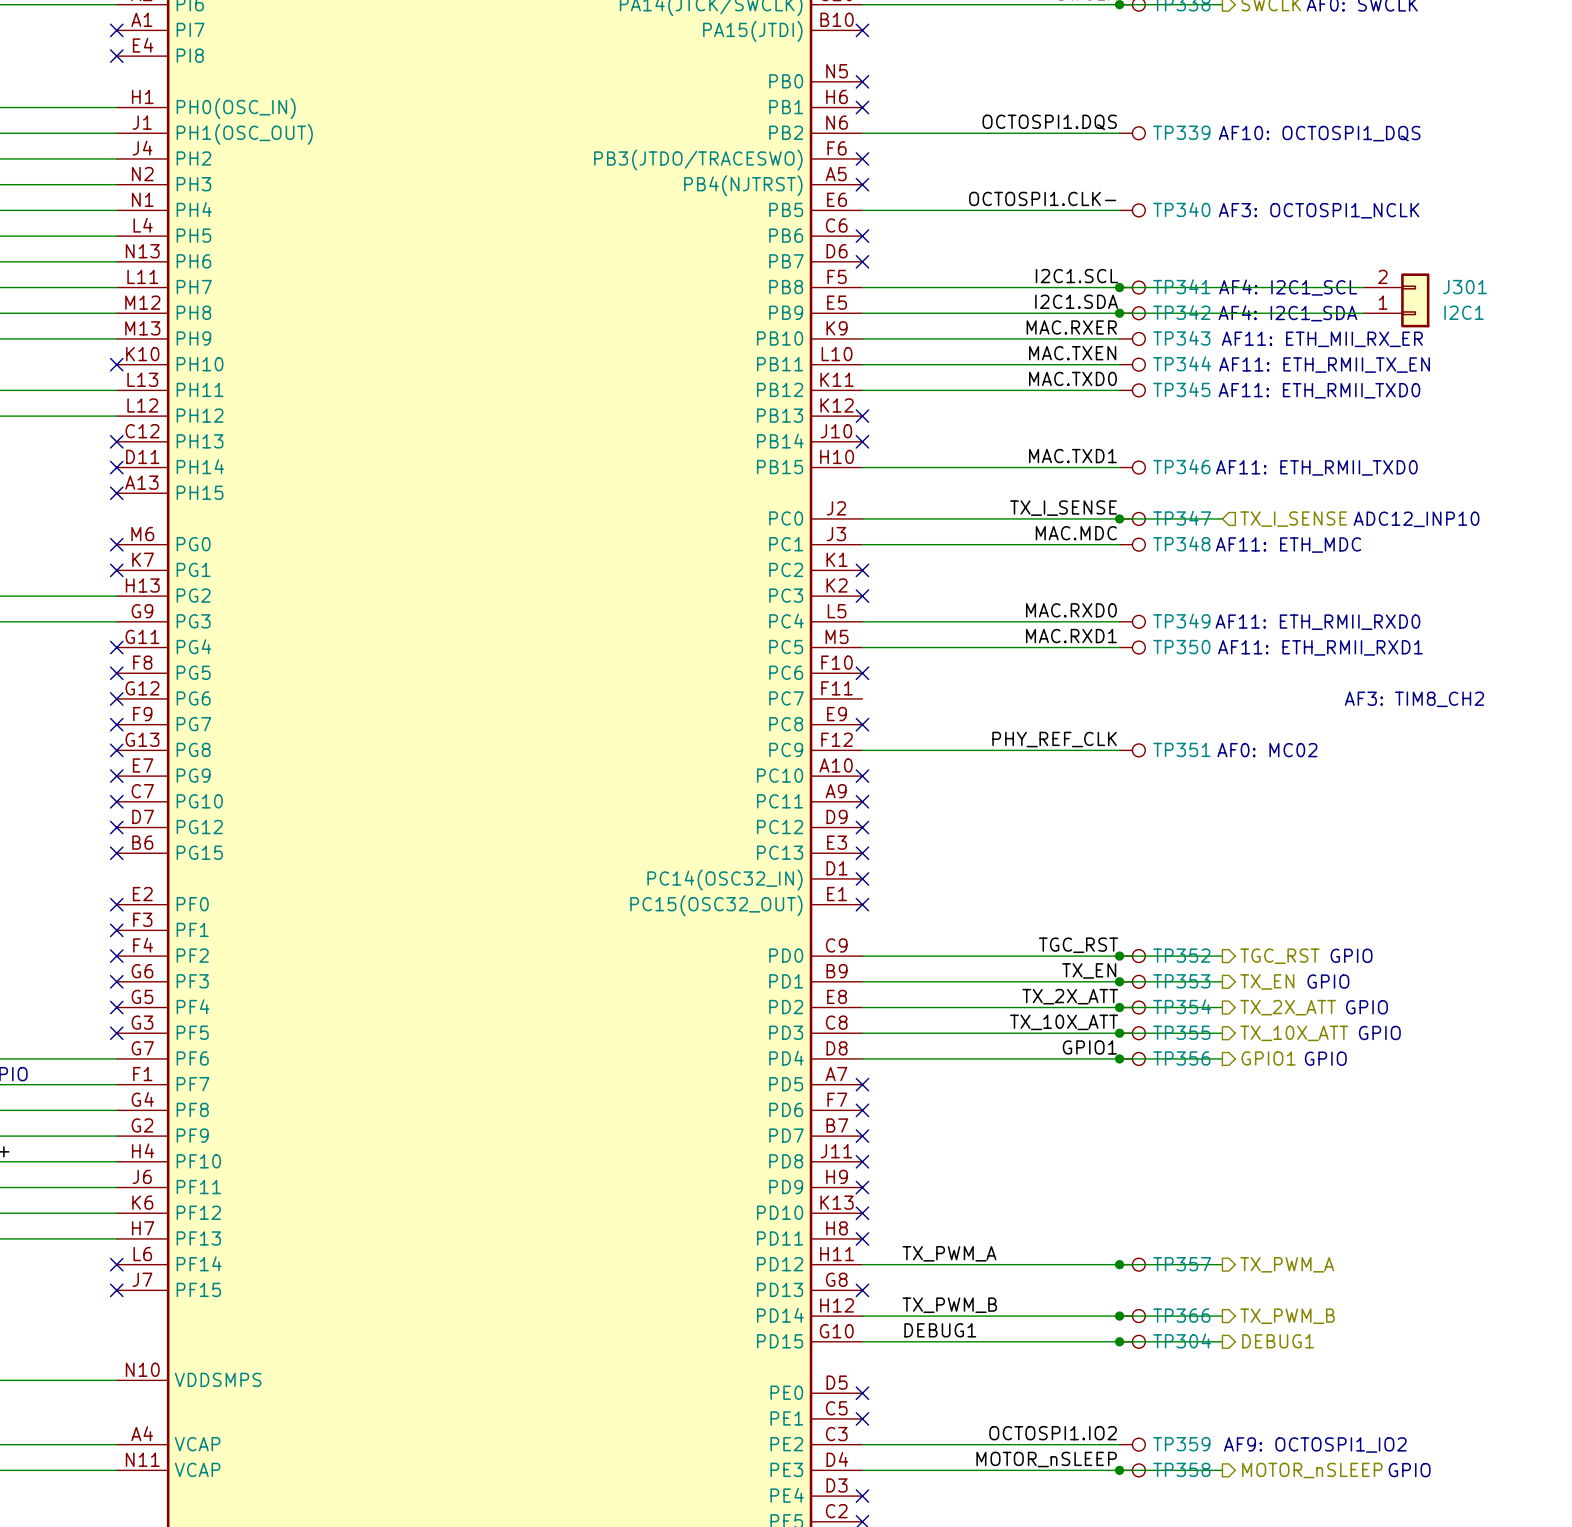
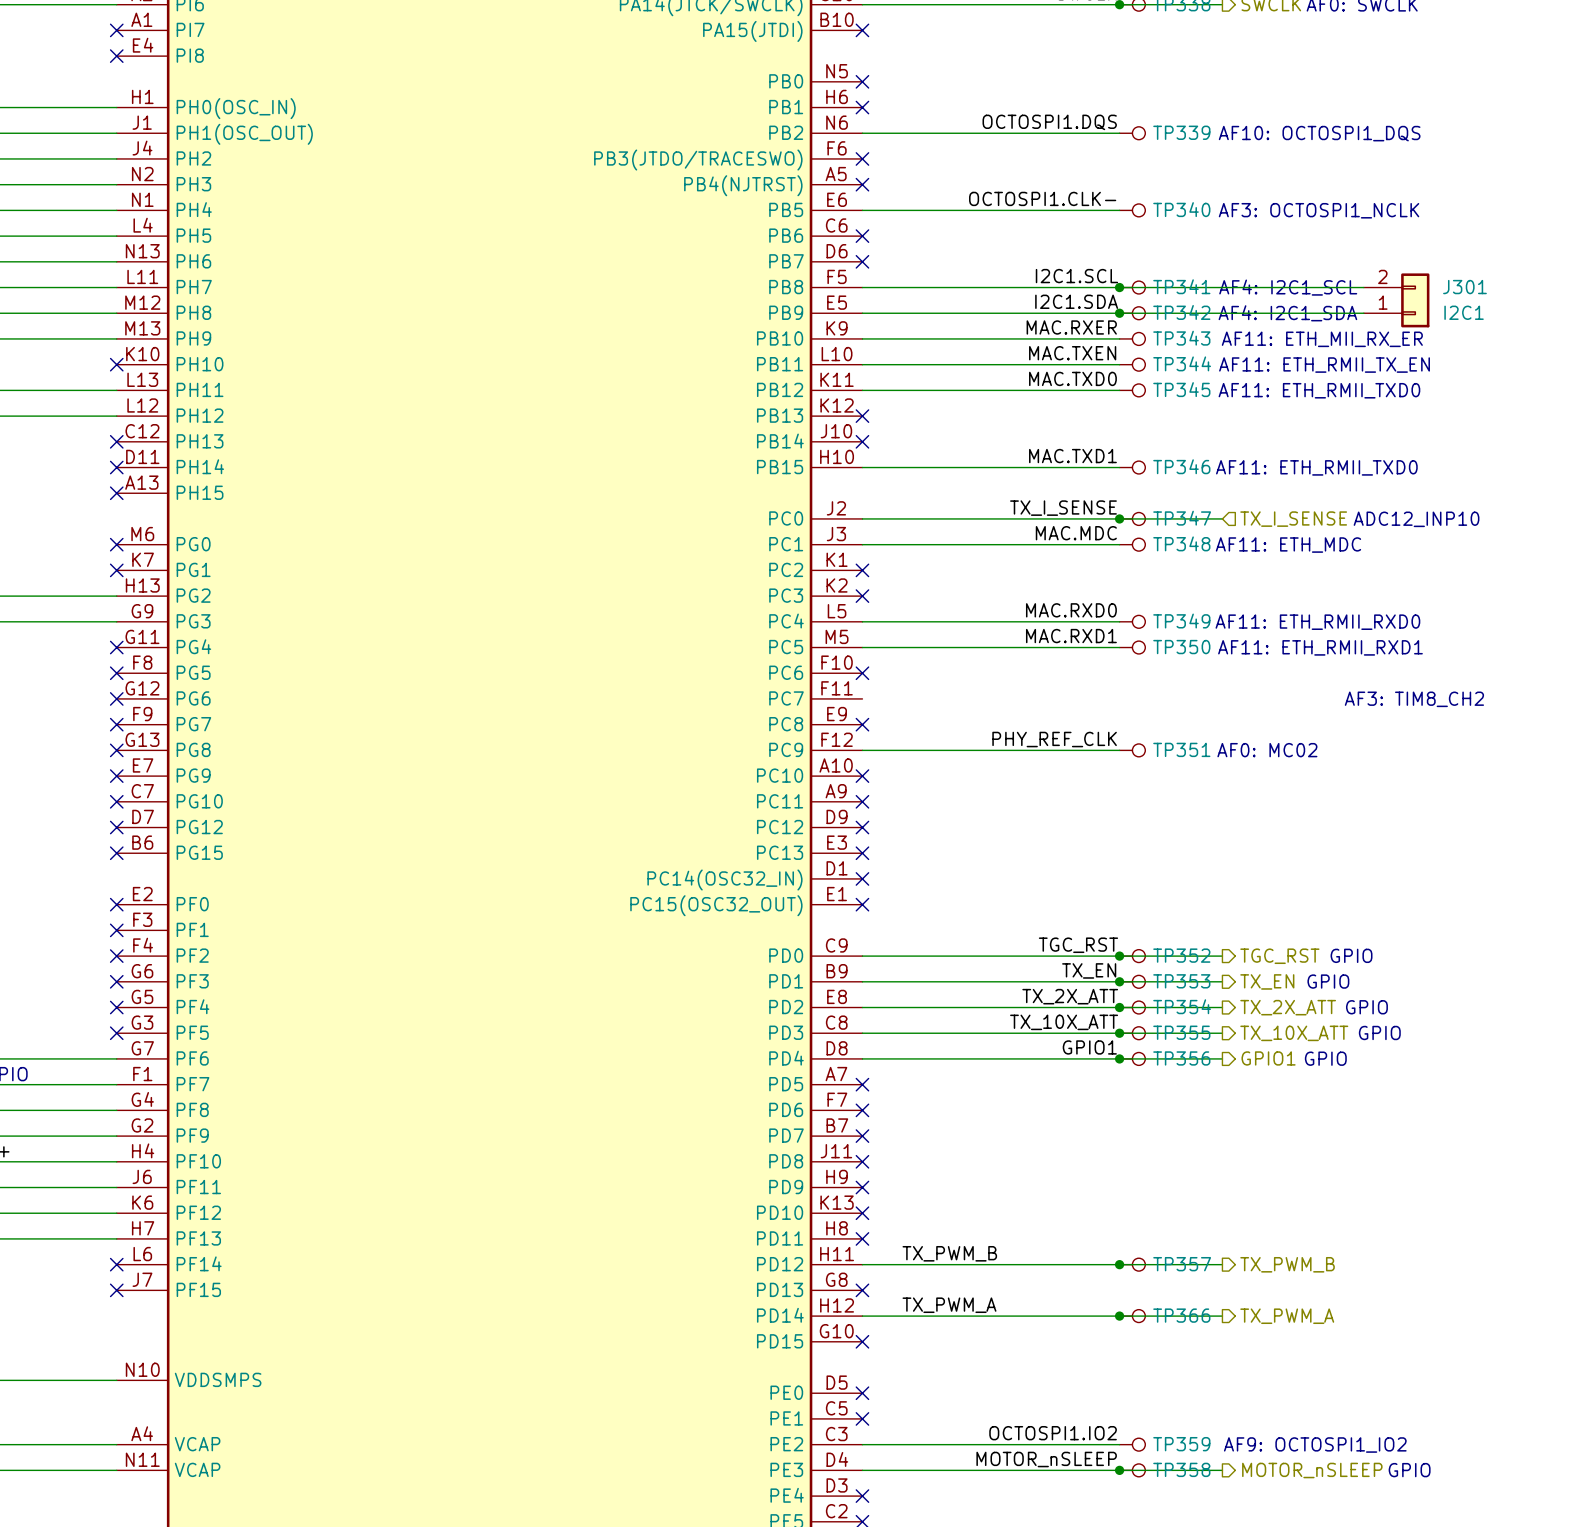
label: TX_PWM_A (949, 1253) -> TX_PWM_B (949, 1253)
hierarchical label: TX_PWM_A (1287, 1264) -> TX_PWM_B (1287, 1264)
label: TX_PWM_B (949, 1305) -> TX_PWM_A (949, 1305)
hierarchical label: TX_PWM_B (1287, 1316) -> TX_PWM_A (1287, 1316)
label: DEBUG1 (940, 1330) -> none
wire: (862, 1341) (1222, 1341) -> none
no-connect mark: none -> (862, 1341)
junction: (1119, 1341) -> none
TP304: (1132, 1341) -> none
hierarchical label: DEBUG1 (1278, 1341) -> none

